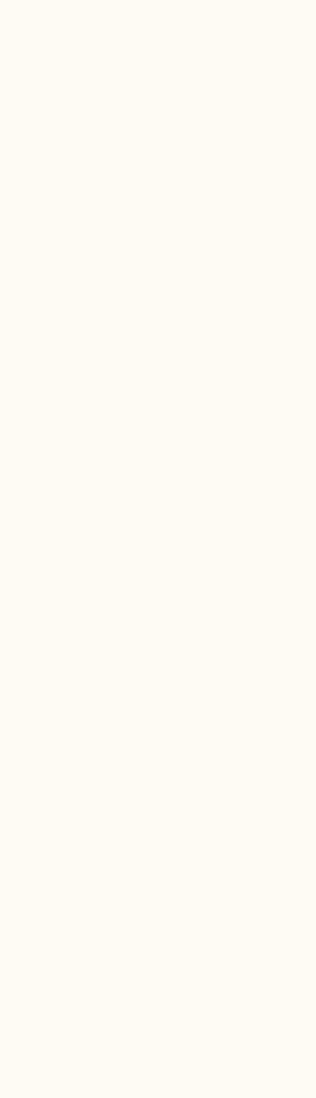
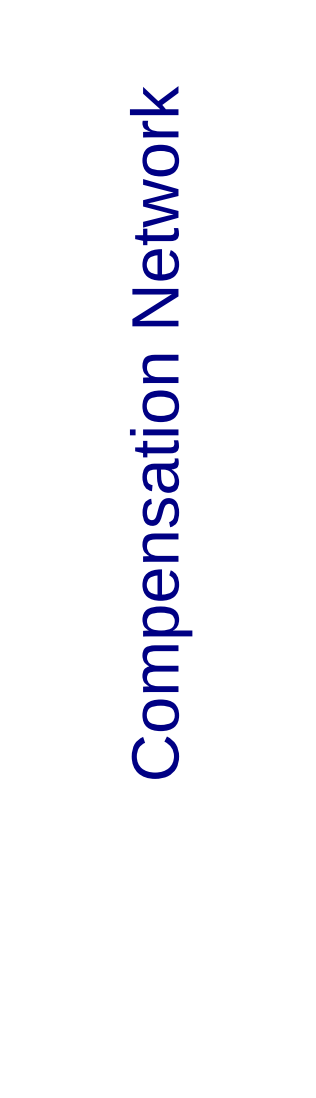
text: none -> Compensation Network (161, 432)

